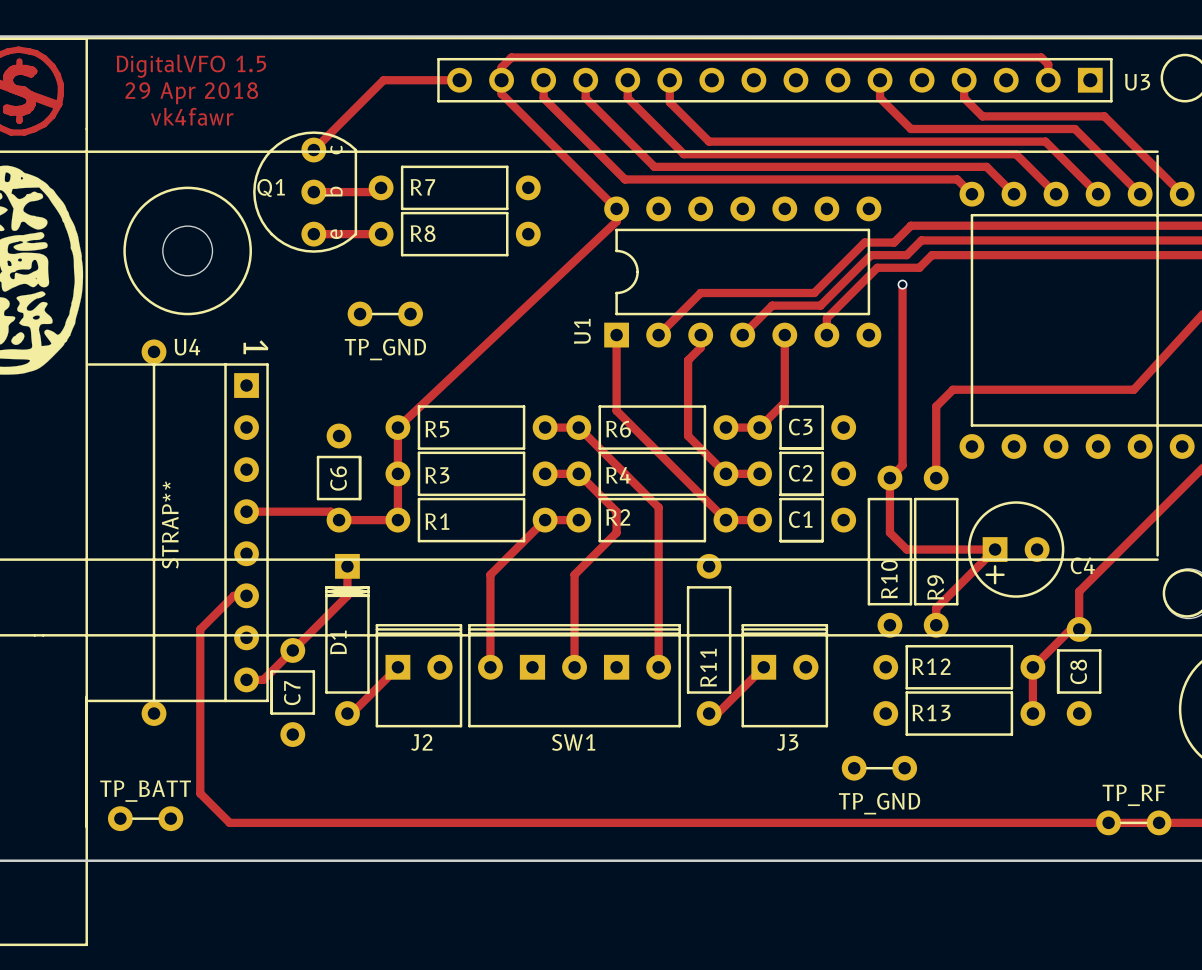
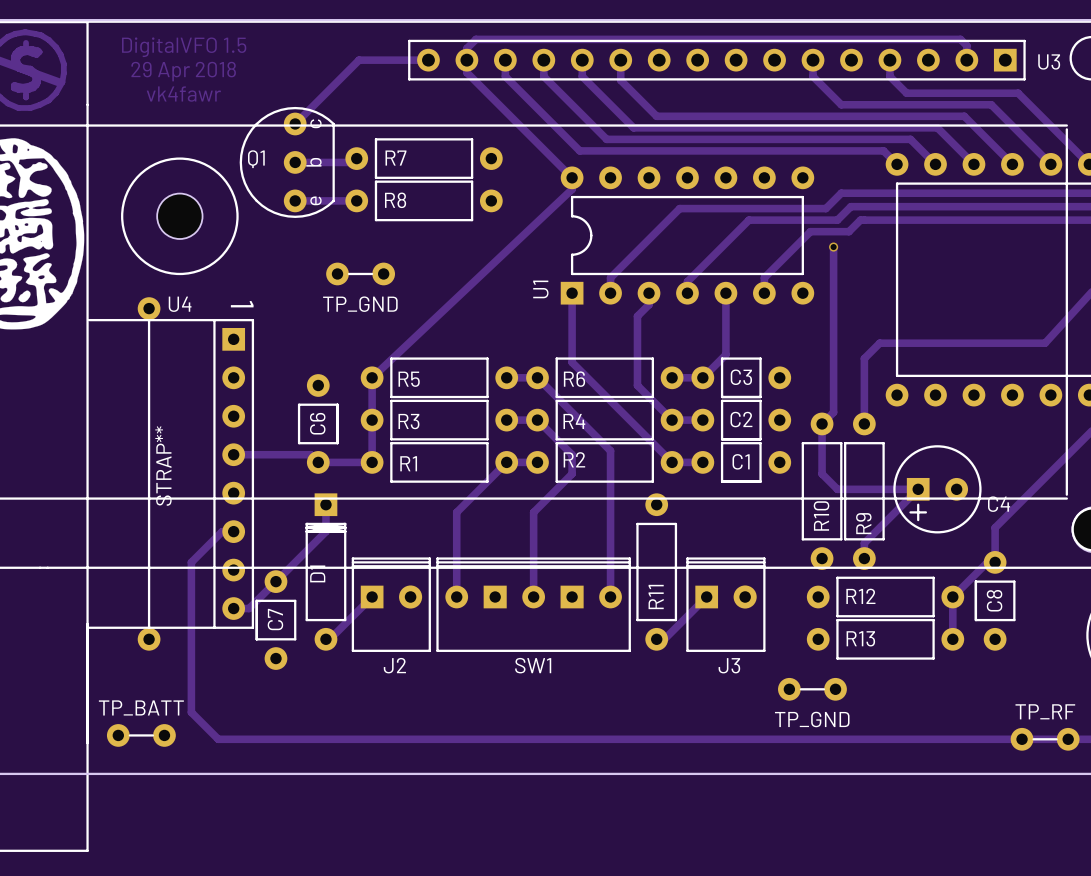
track: (864, 242) (814, 293) (700, 293) (658, 335) -> (798, 208) (679, 208) (610, 277) (610, 293)
track: (871, 255) (820, 305) (772, 305) (742, 335) -> (804, 220) (749, 220) (687, 281) (687, 293)

